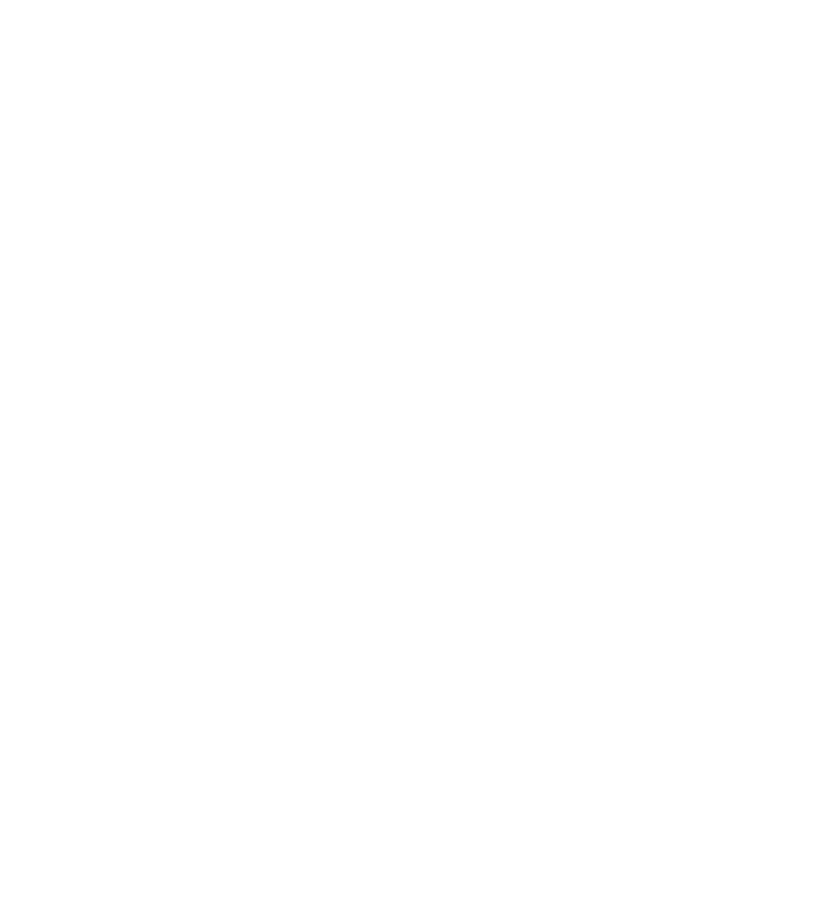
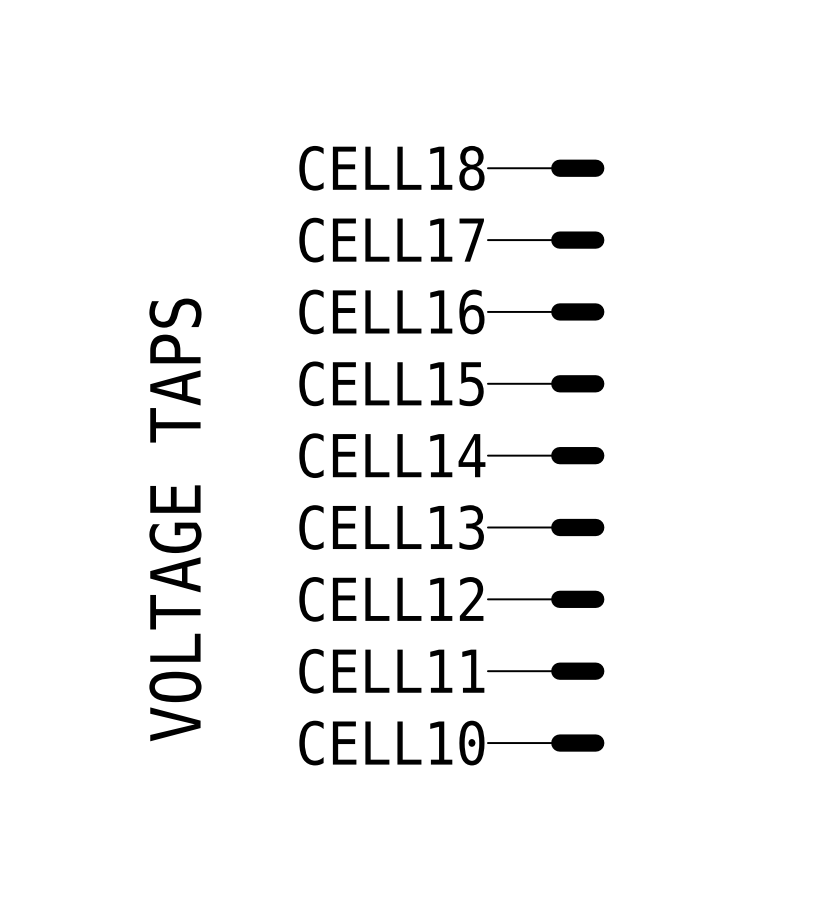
CELL18: none -> (546, 168)
CELL17: none -> (546, 240)
CELL16: none -> (546, 311)
CELL15: none -> (546, 383)
CELL14: none -> (546, 455)
text: none -> VOLTAGE TAPS (175, 519)
CELL13: none -> (546, 527)
CELL12: none -> (546, 599)
CELL11: none -> (546, 671)
CELL10: none -> (546, 743)

